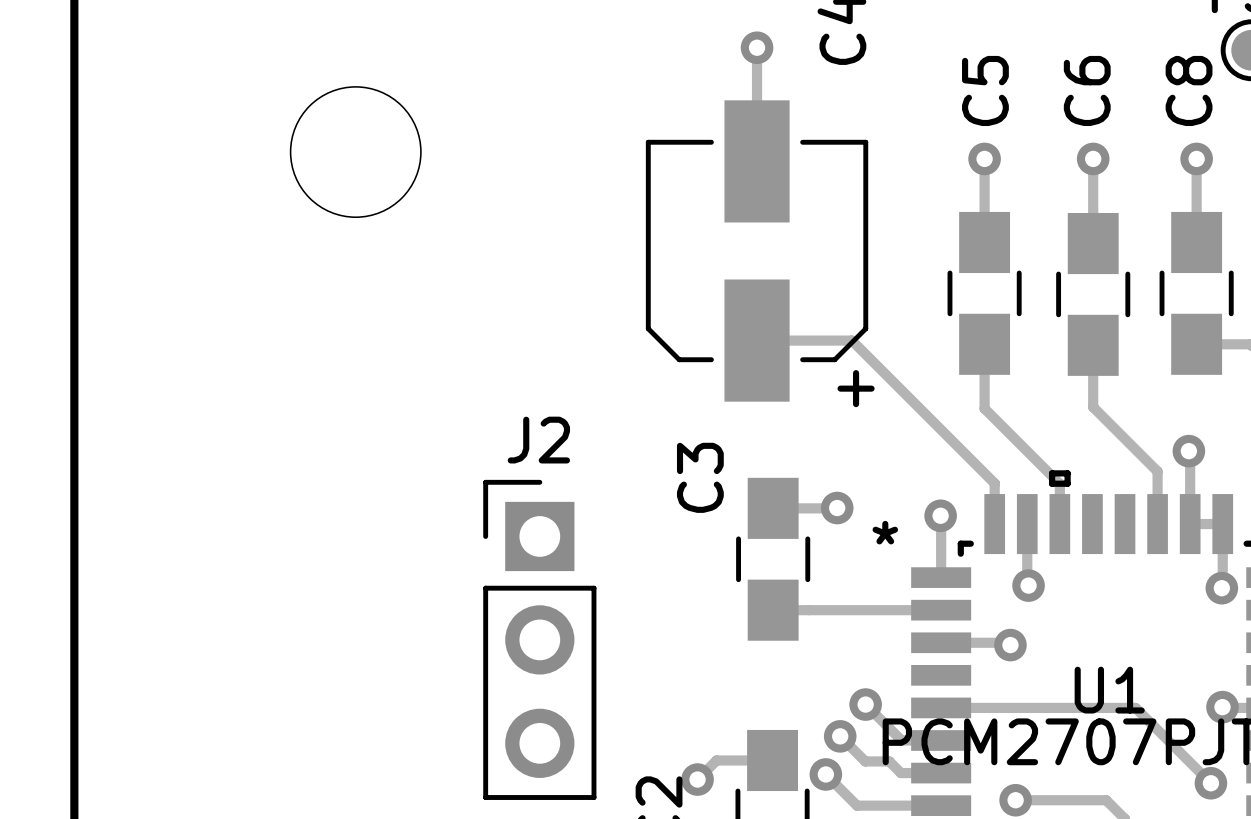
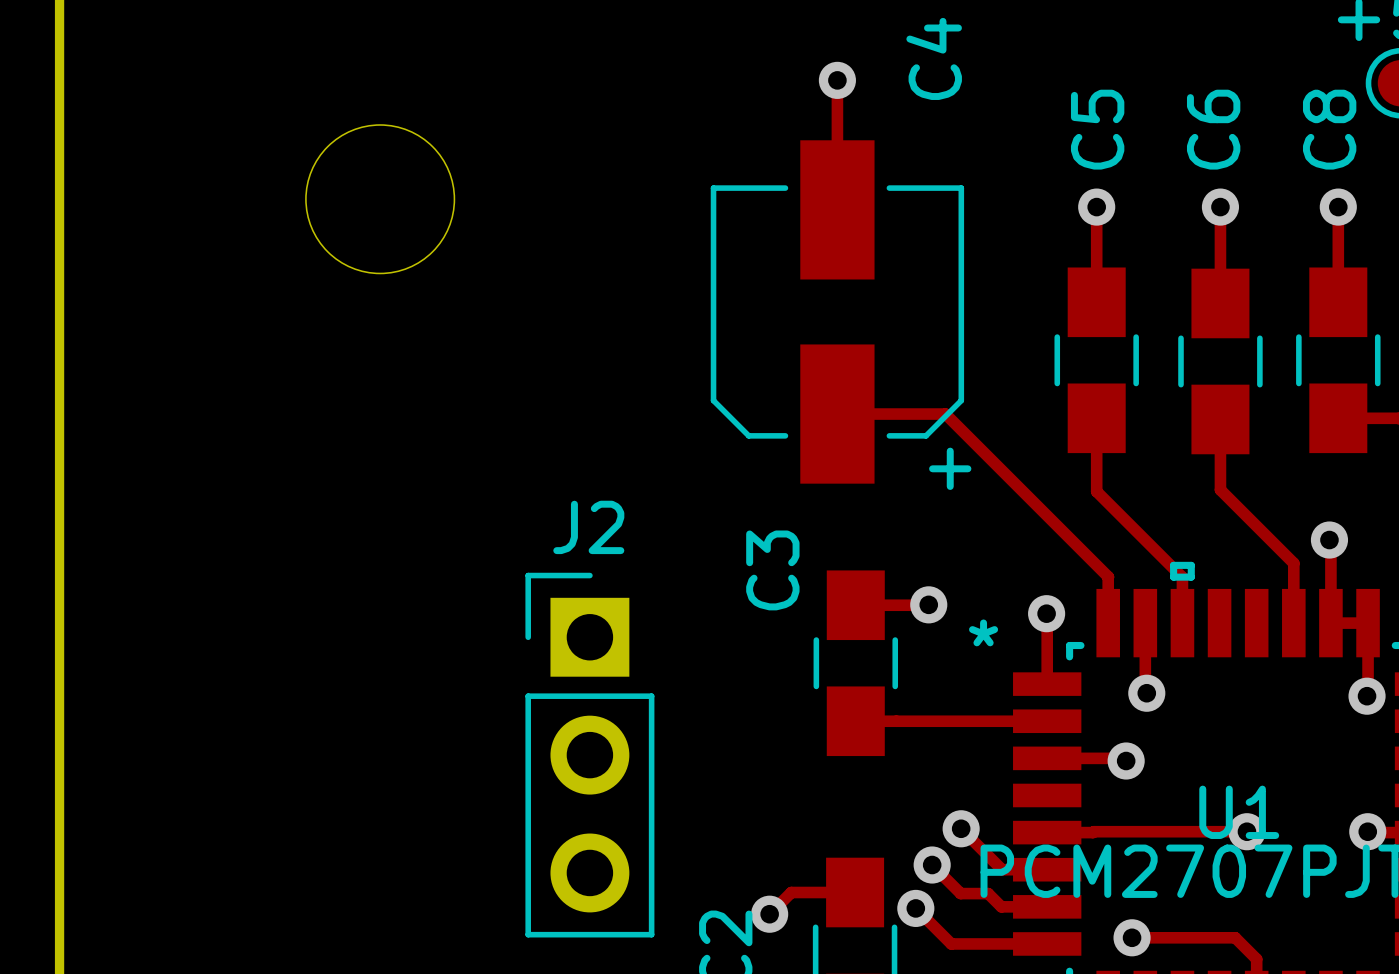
track: (981, 707) (1135, 707) (1210, 783) -> (1092, 832) (1246, 831)
via position: (1210, 783) -> (1246, 831)

